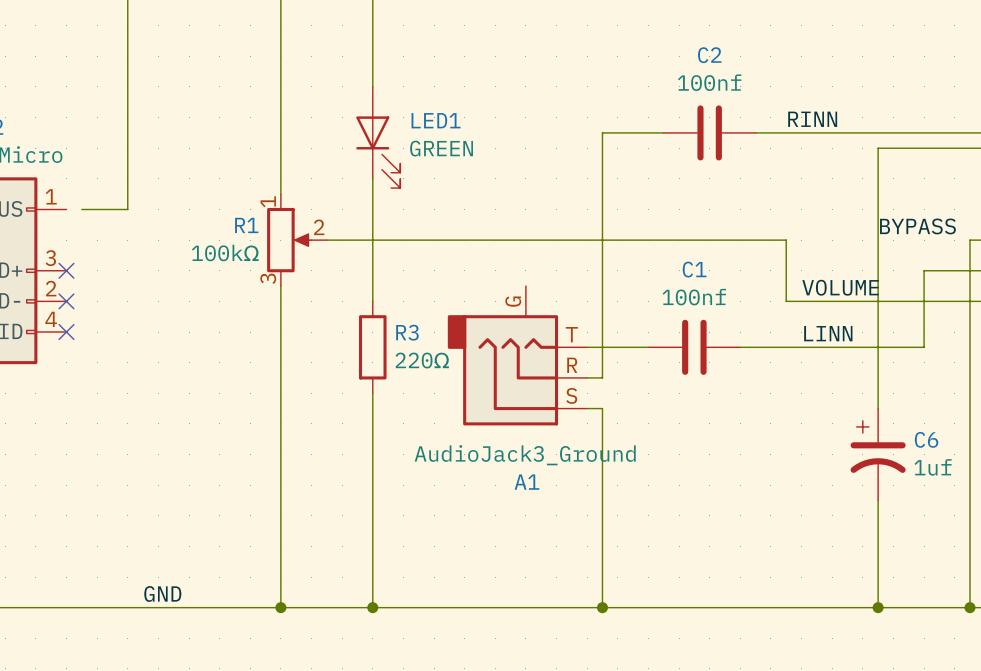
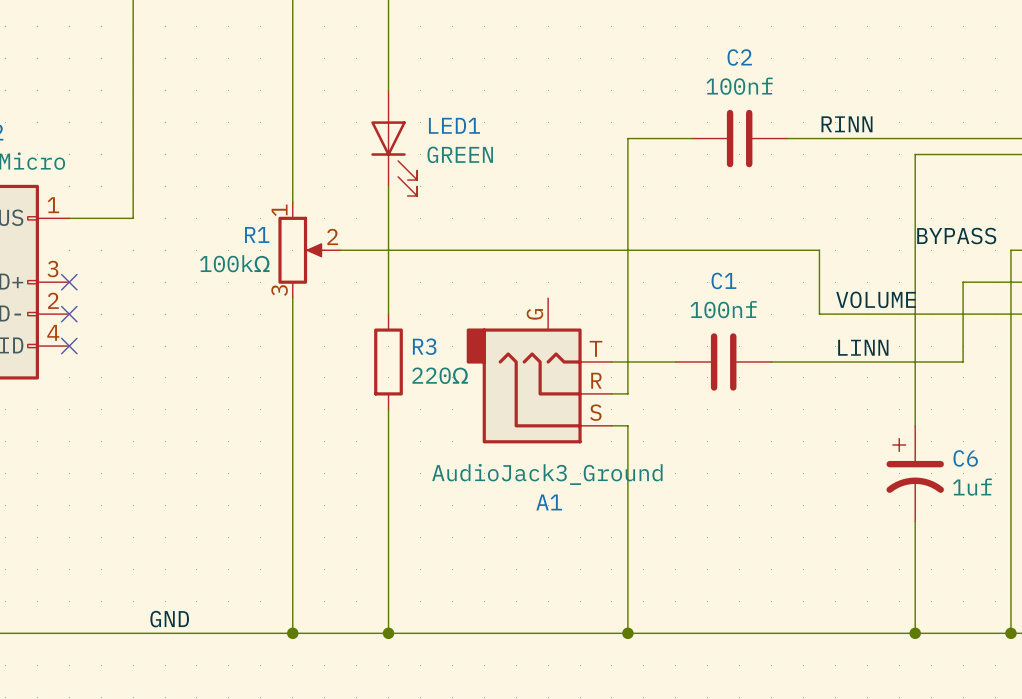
wire: none -> (69, 218) (85, 218)

